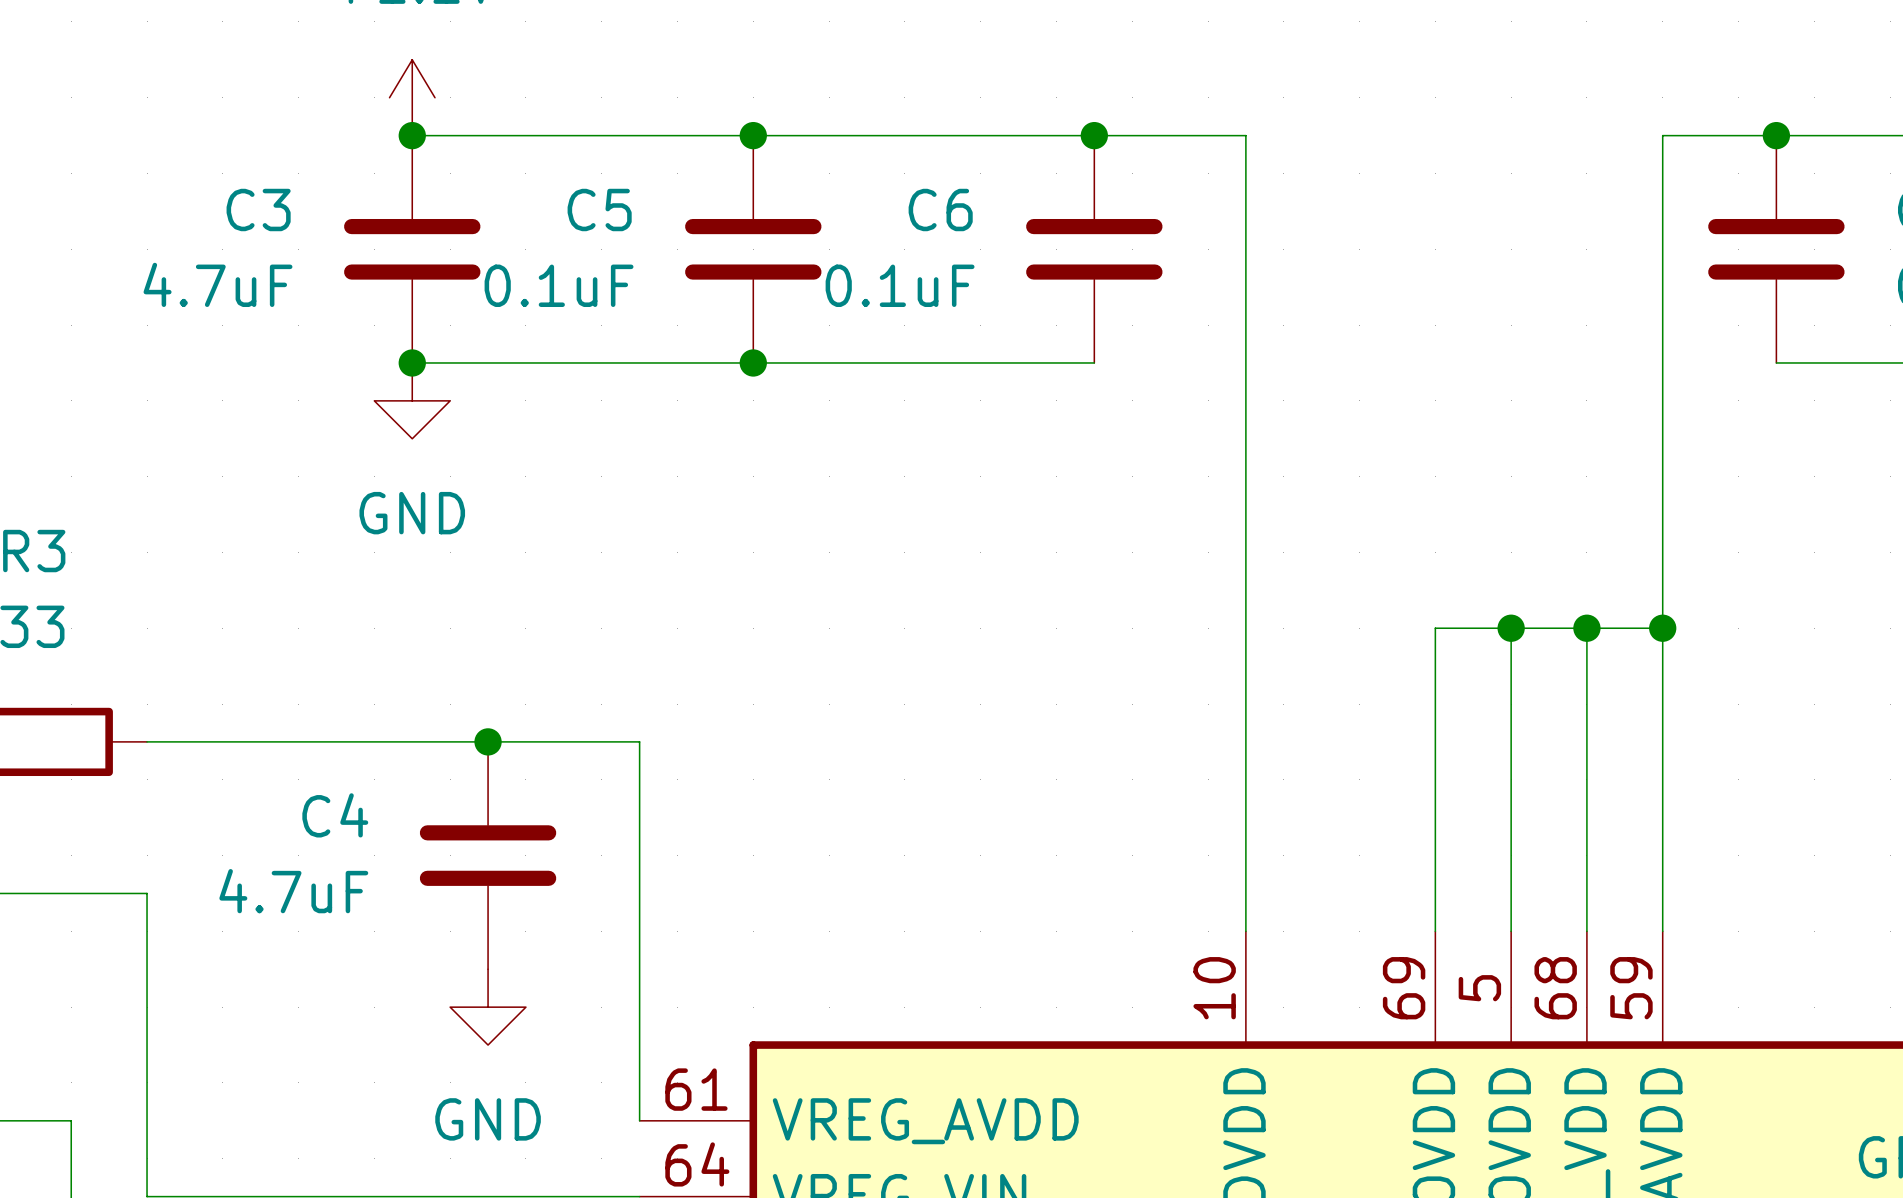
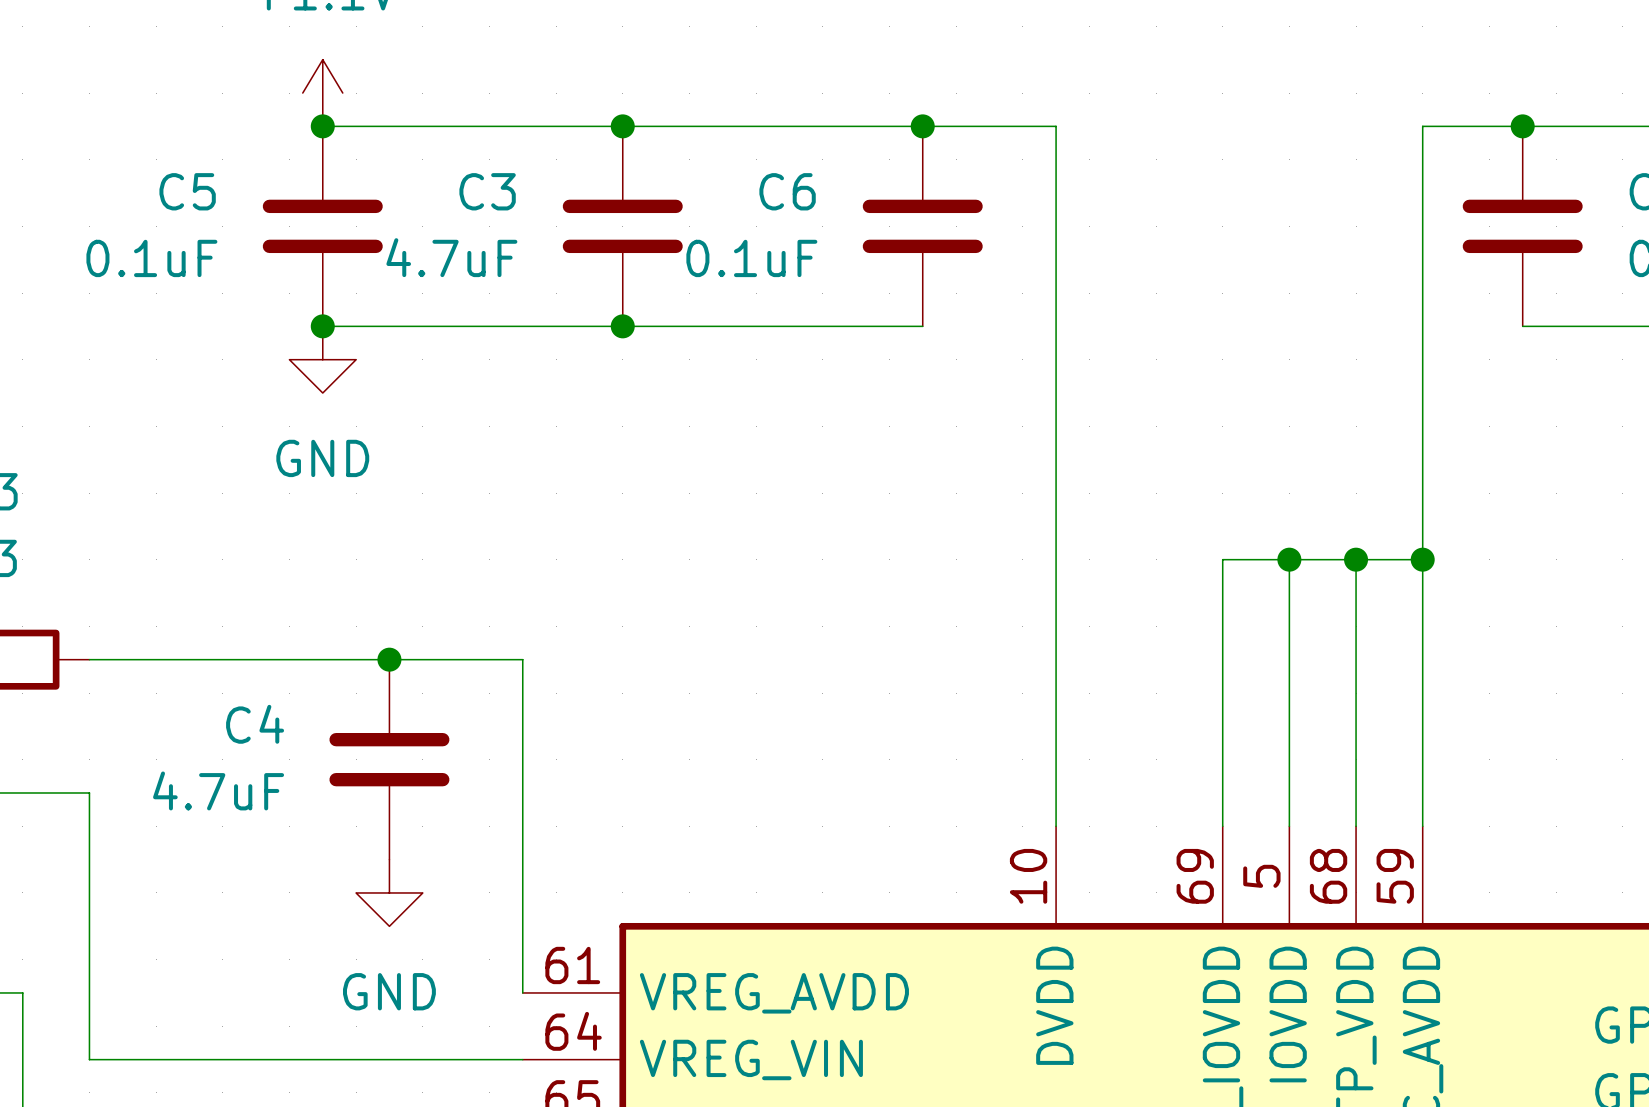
C3 name: C3 (258, 209) -> C5 (187, 191)
C5 name: C5 (599, 209) -> C3 (487, 191)
C3 value: 4.7uF (218, 284) -> 0.1uF (151, 258)
C5 value: 0.1uF (559, 285) -> 4.7uF (451, 257)

